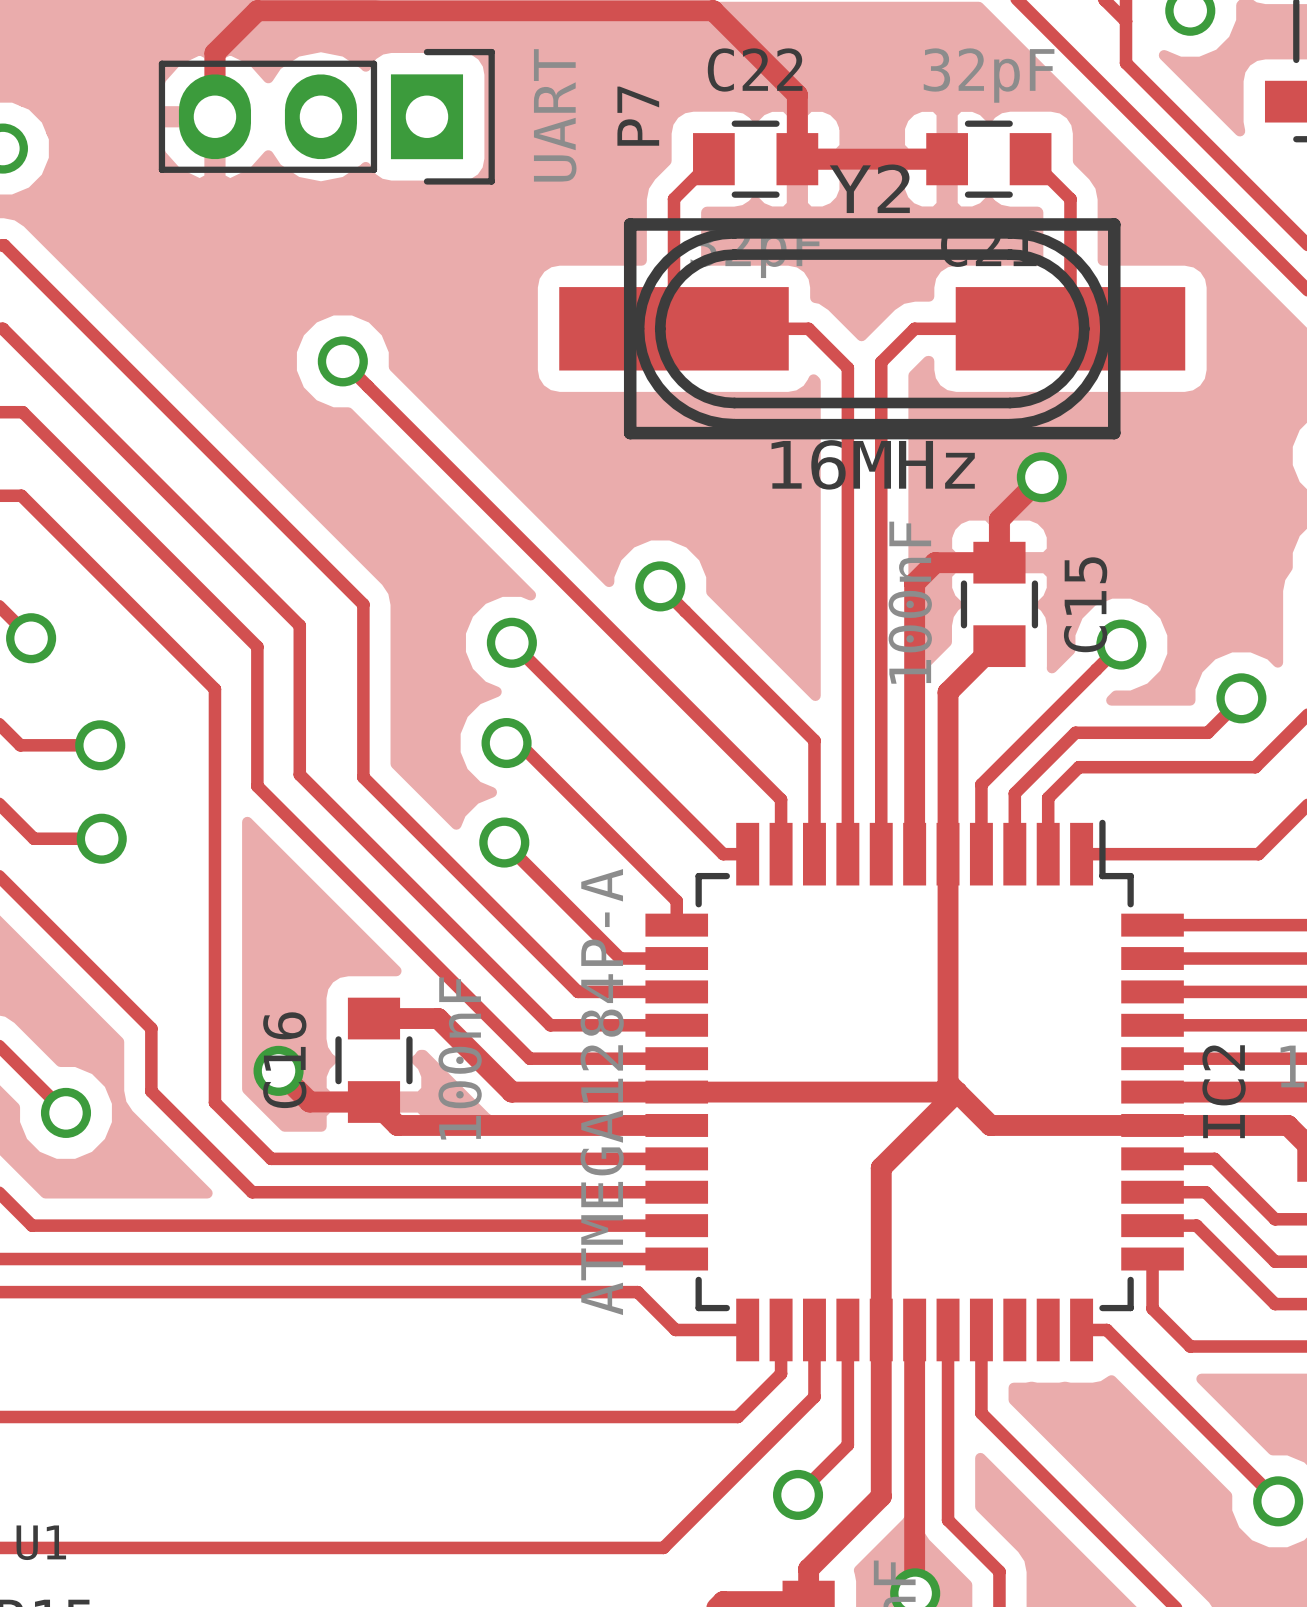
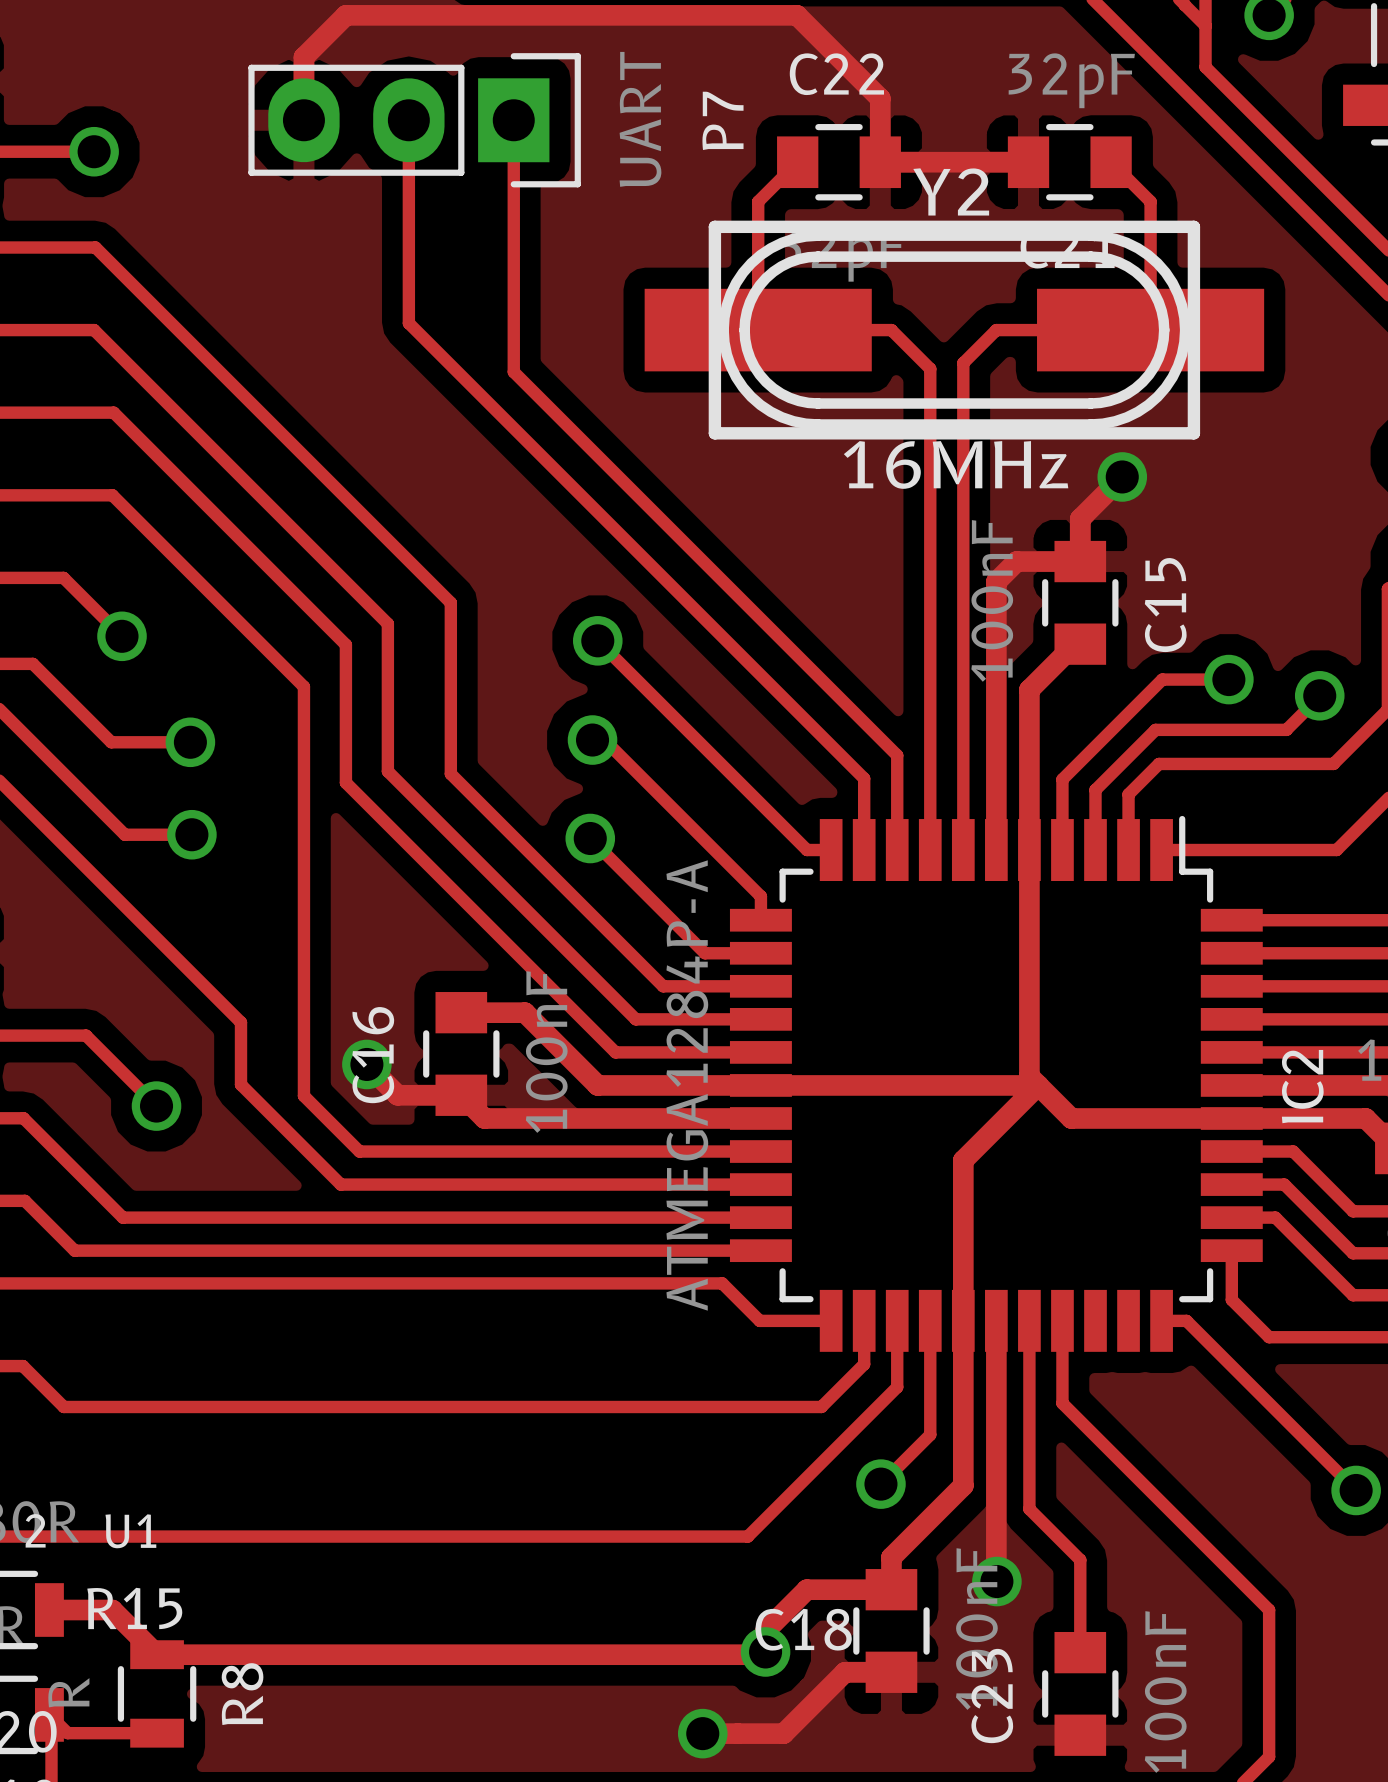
track: (342, 361) (781, 799) -> (408, 120) (408, 323) (864, 778) (864, 796)
via: (342, 361) -> none
track: (660, 586) (814, 740) (814, 758) -> (513, 120) (513, 371) (897, 755)
via: (660, 586) -> none
track: (1121, 644) (981, 784) -> (1228, 679) (1162, 679) (1062, 781)
via position: (1121, 644) -> (1228, 679)

